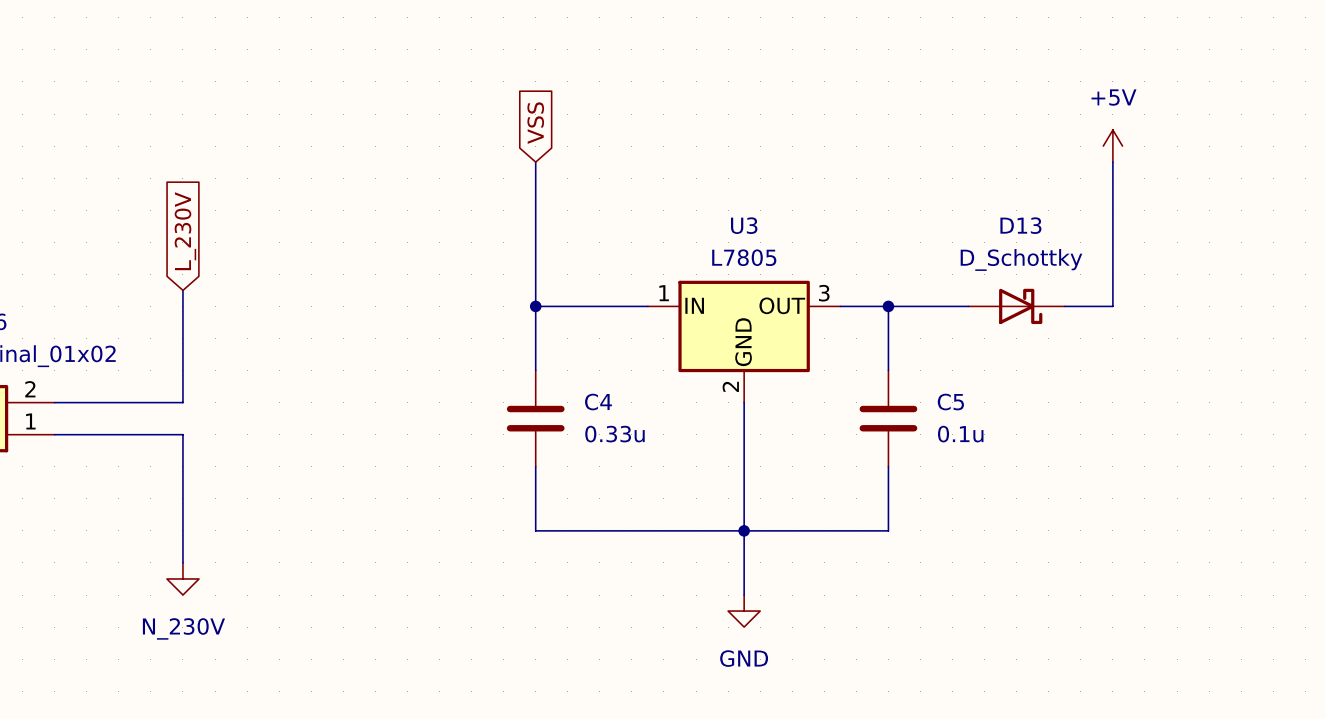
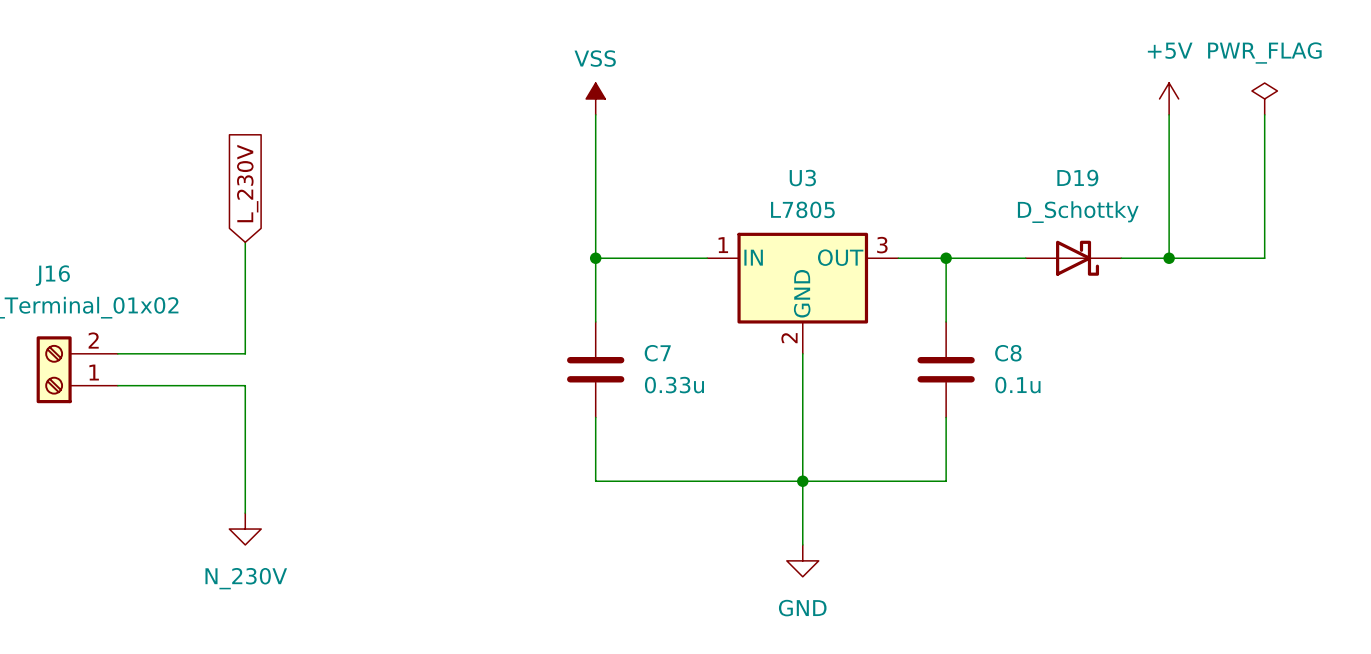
global label: VSS (535, 123) -> none
power symbol: none -> VSS (595, 98)
power symbol: none -> PWR_FLAG (1264, 98)
wire: none -> (1264, 114) (1264, 258) (1169, 258)
D13 name: D13 (1020, 225) -> D19 (1077, 178)
junction: none -> (1169, 258)
C4 name: C4 (598, 402) -> C7 (657, 353)
C5 name: C5 (950, 402) -> C8 (1008, 353)

